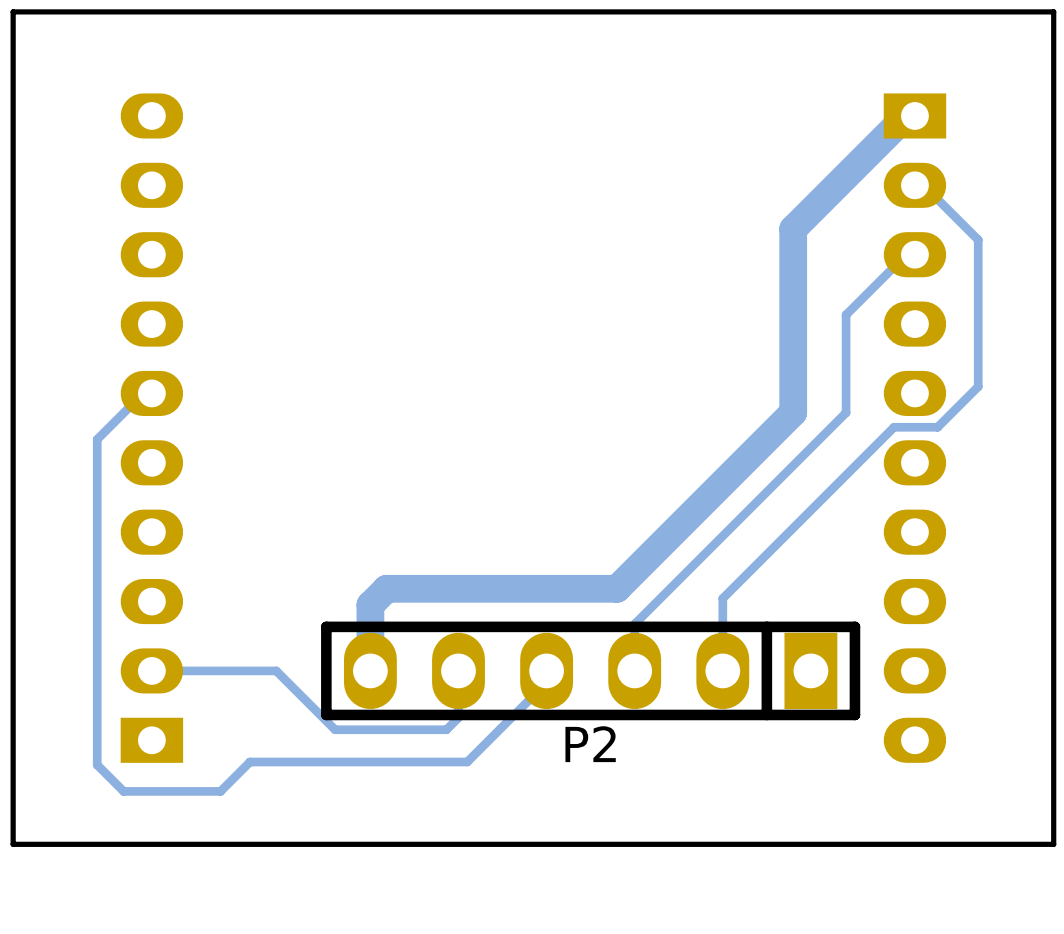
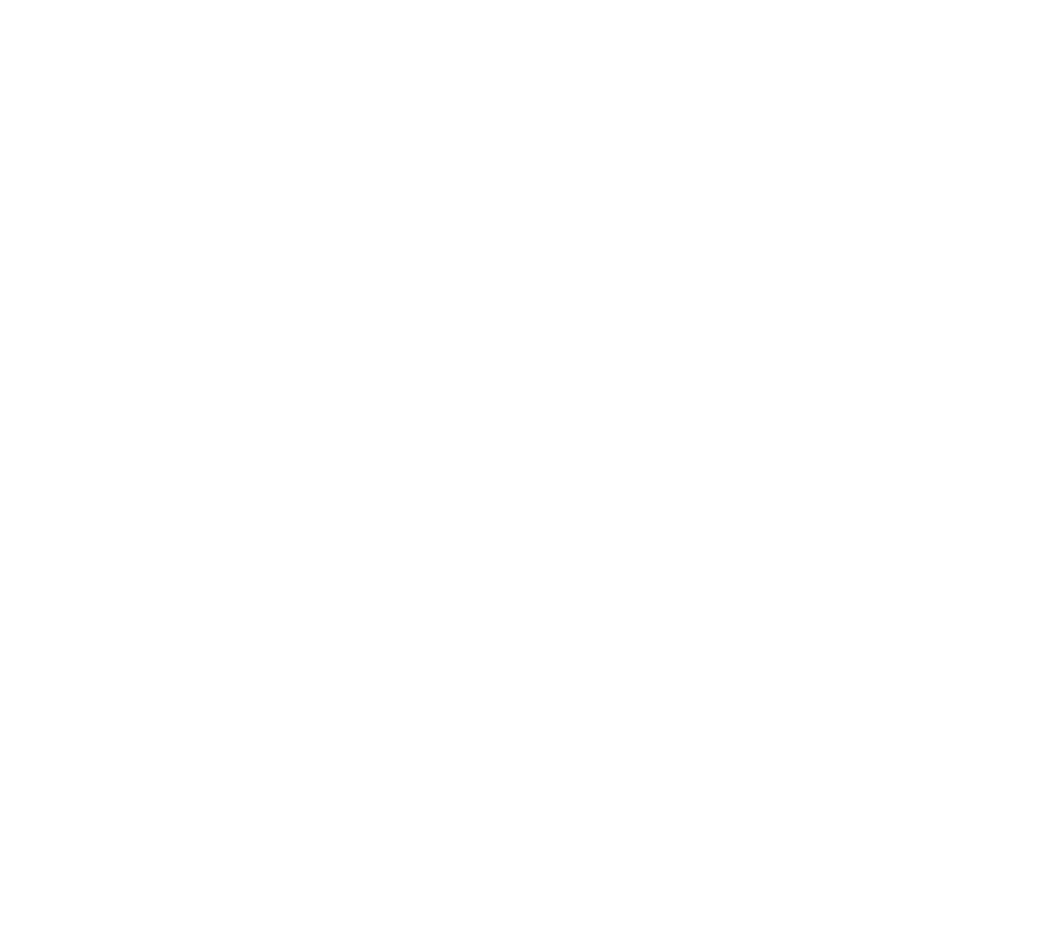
board edge: (1053, 11) (1053, 844) (13, 844) (13, 11) (1053, 11) -> none
bottom track: (914, 115) (906, 115) (793, 229) (793, 412) (617, 588) (386, 588) (370, 605) (370, 670) -> none
bottom track: (914, 185) (923, 185) (978, 239) (978, 386) (937, 427) (894, 427) (722, 598) (722, 670) -> none
bottom track: (914, 254) (906, 254) (846, 314) (846, 412) (634, 624) (634, 670) -> none
bottom track: (151, 393) (143, 393) (97, 439) (97, 764) (123, 791) (220, 791) (249, 762) (467, 762) (546, 682) (546, 670) -> none
part: (151, 428) -> none
part: (914, 428) -> none
bottom track: (458, 670) (458, 717) (446, 729) (335, 729) (276, 670) (143, 670) -> none
P2: (590, 670) -> none

